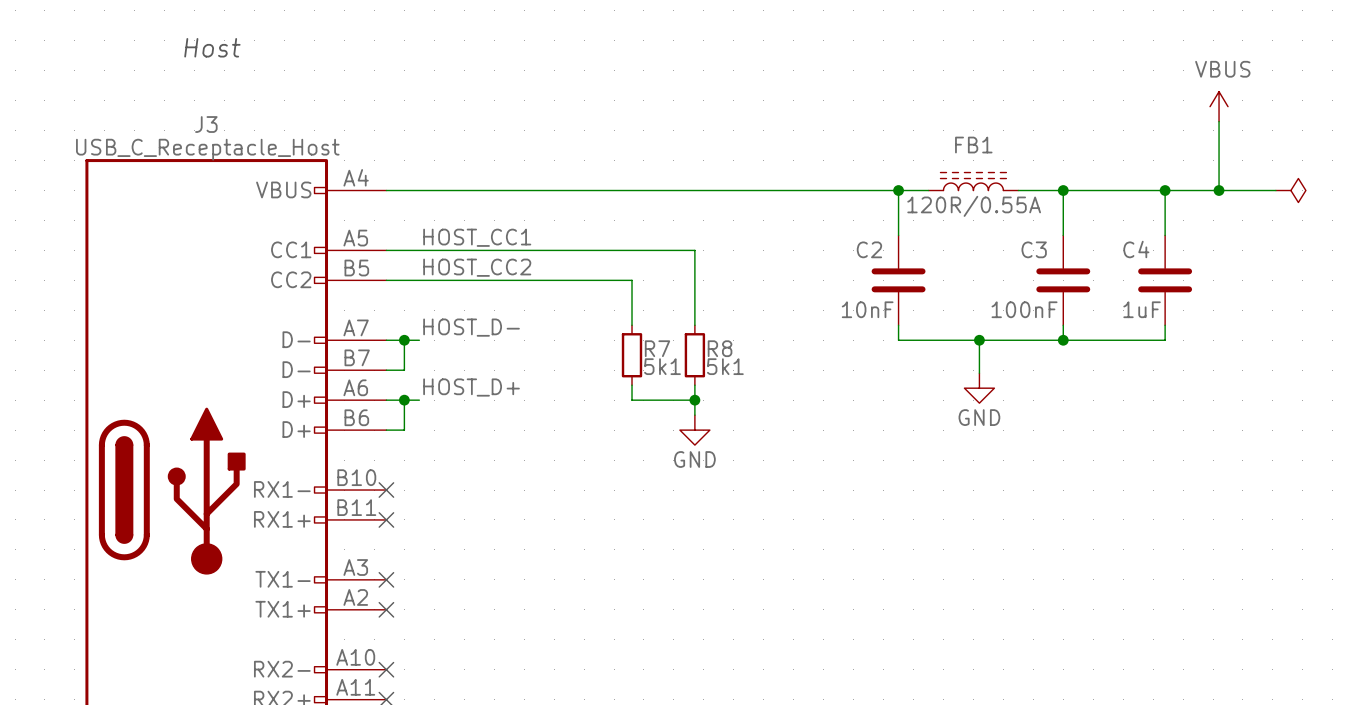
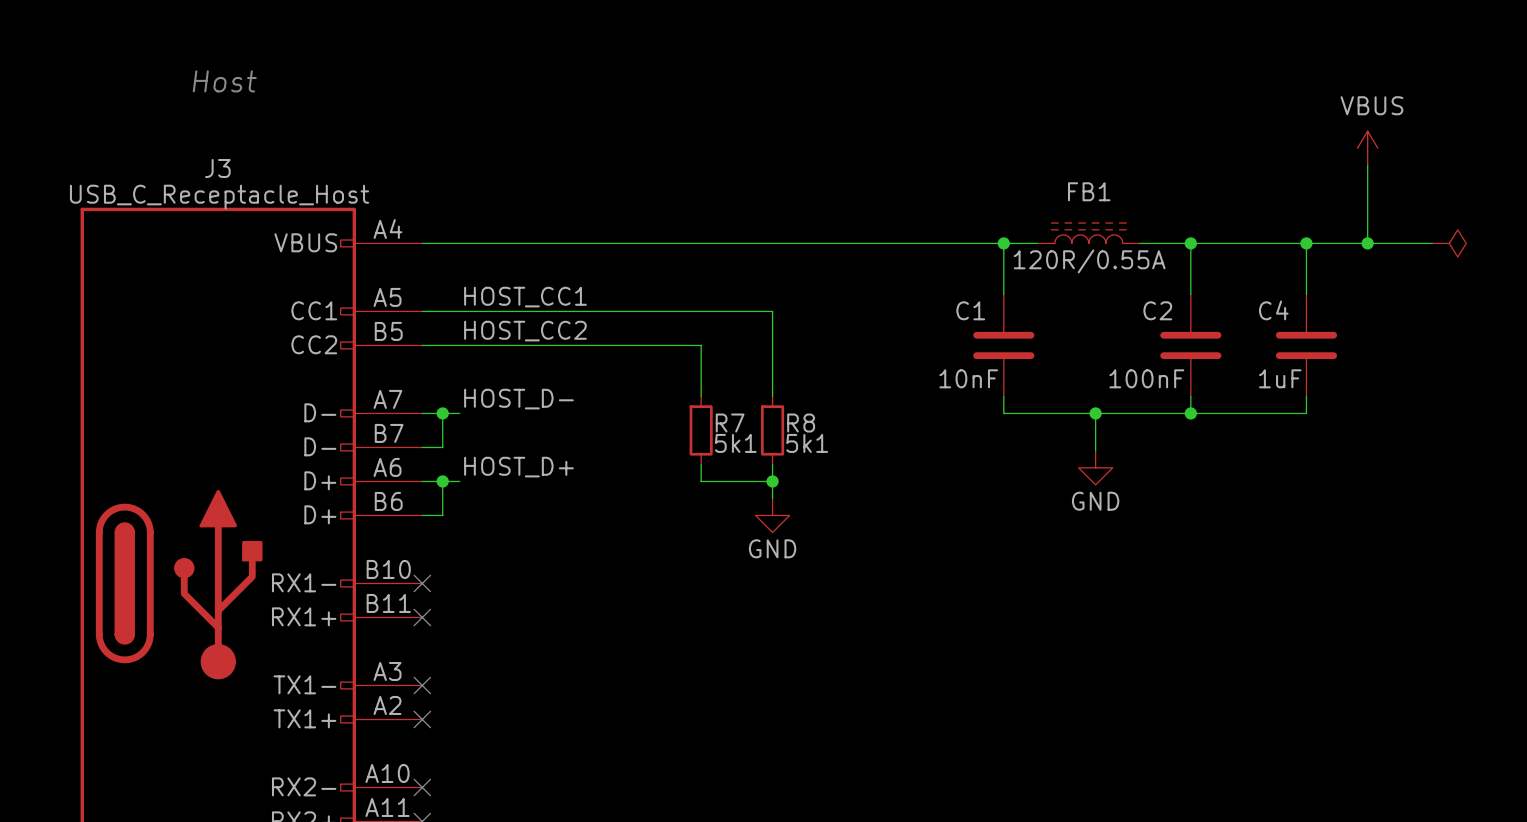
C2 name: C2 (869, 249) -> C1 (970, 310)
C3 name: C3 (1034, 249) -> C2 (1157, 310)

